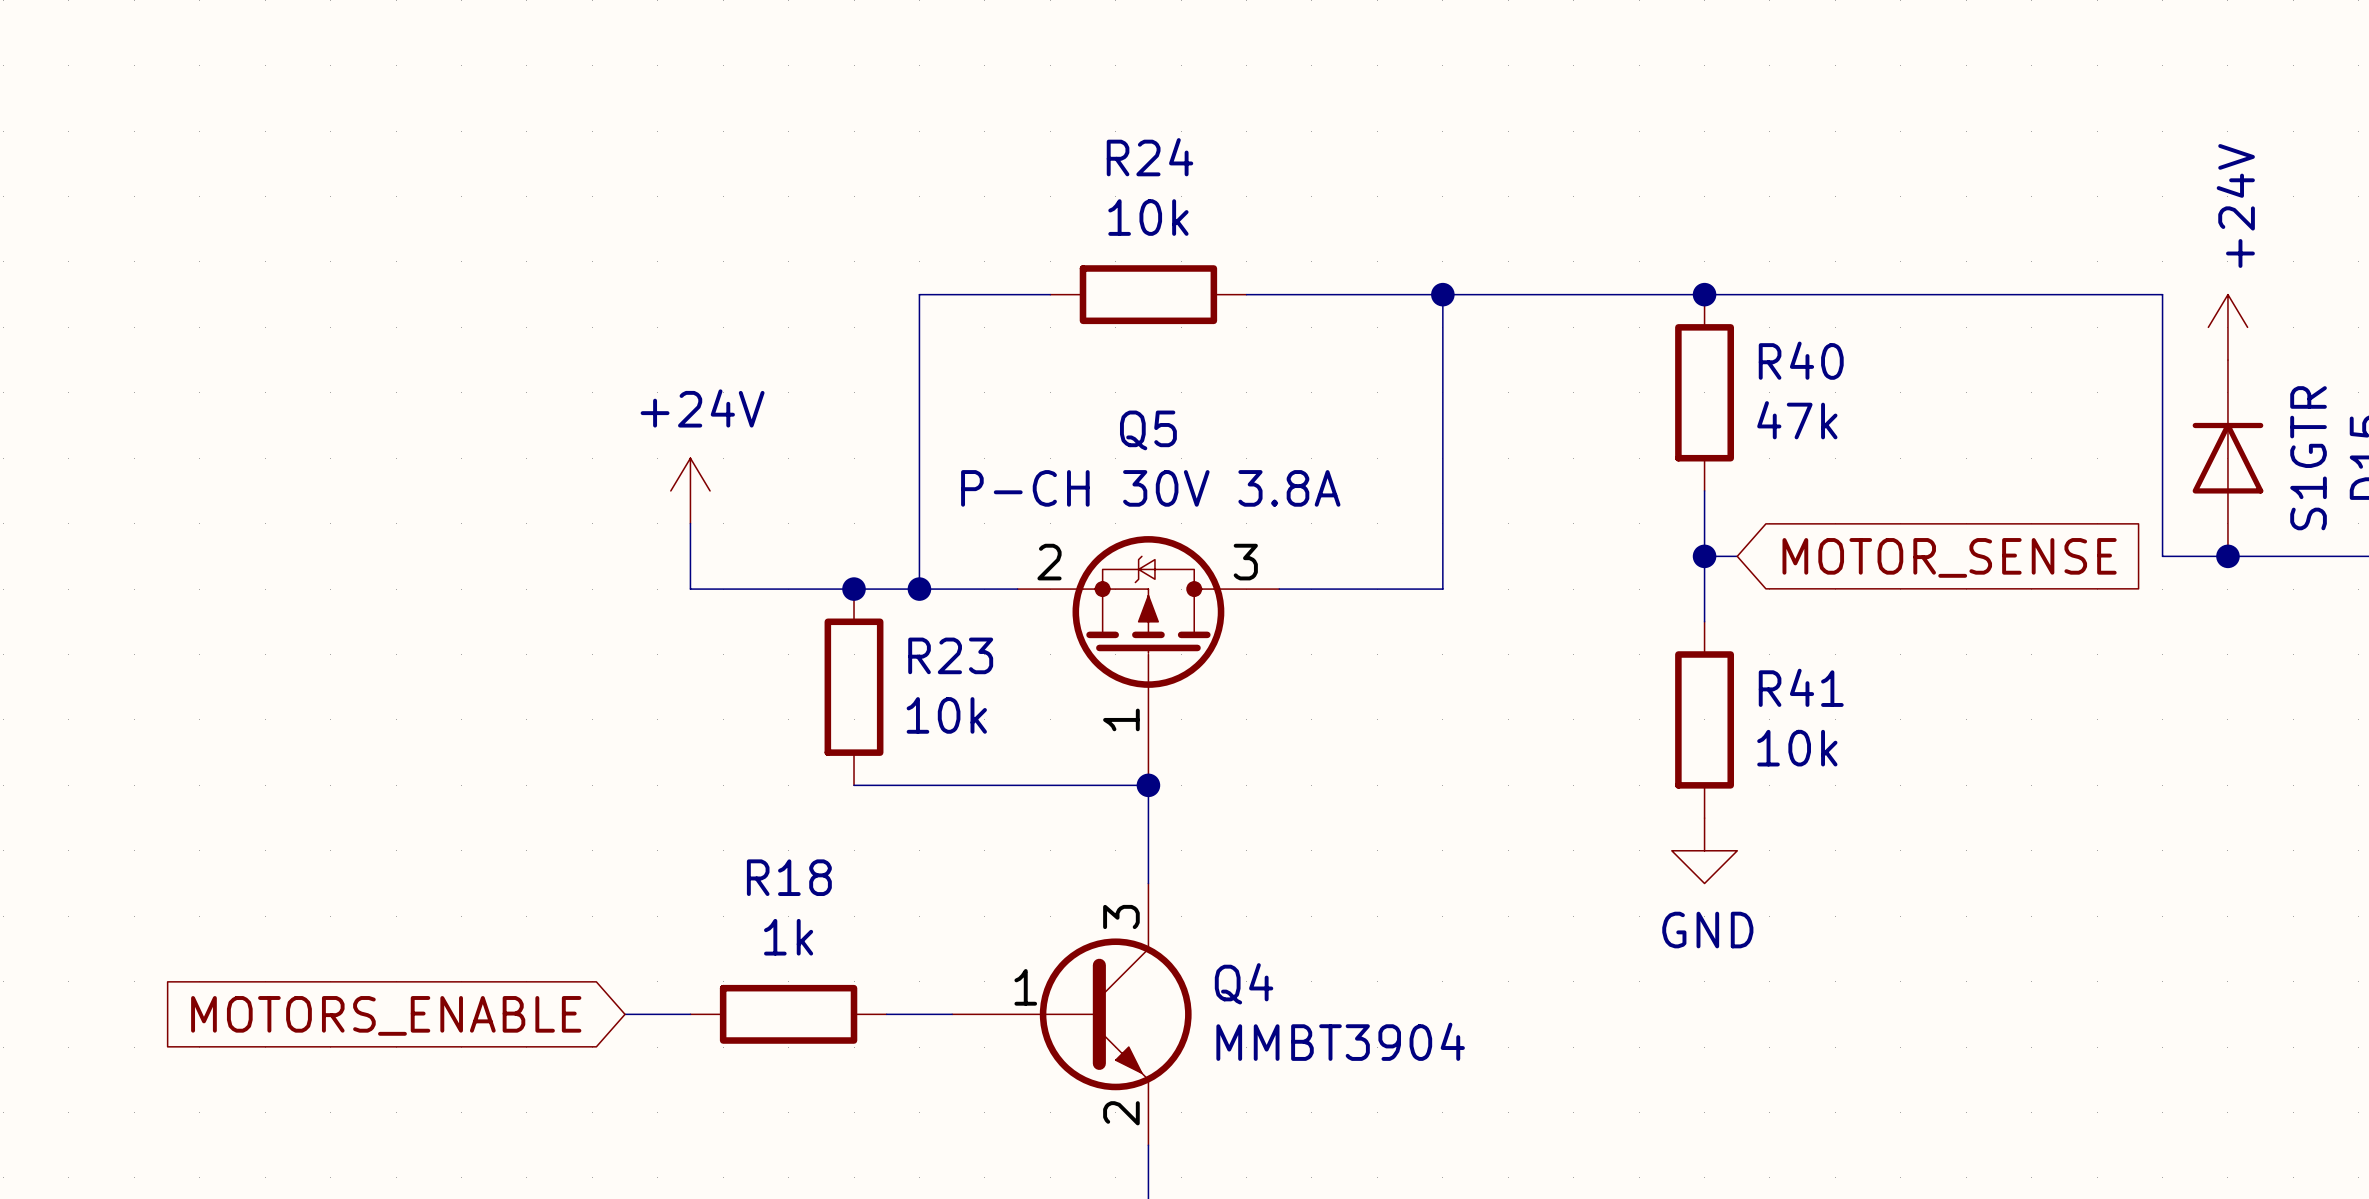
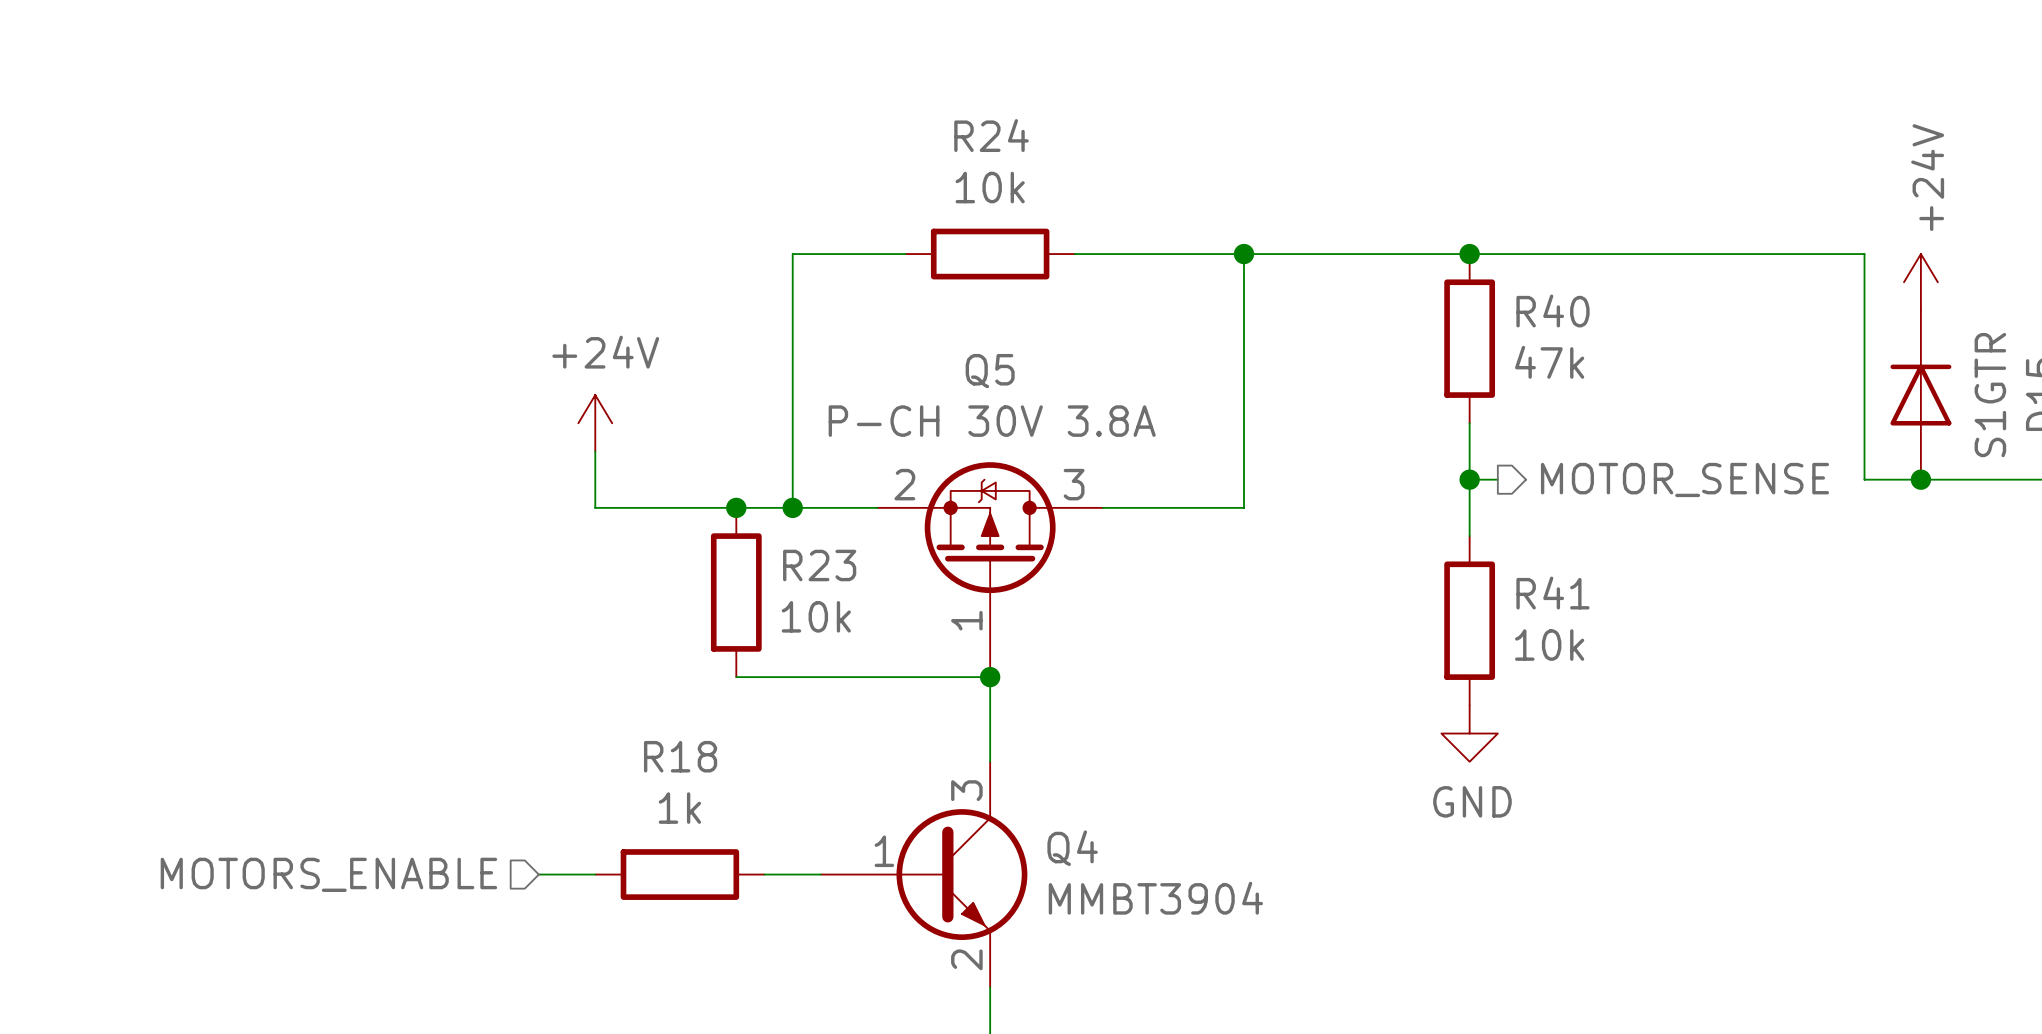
hierarchical label: none -> MOTOR_SENSE (1684, 479)
global label: MOTOR_SENSE (1949, 557) -> none
hierarchical label: none -> MOTORS_ENABLE (328, 874)
global label: MOTORS_ENABLE (386, 1015) -> none

